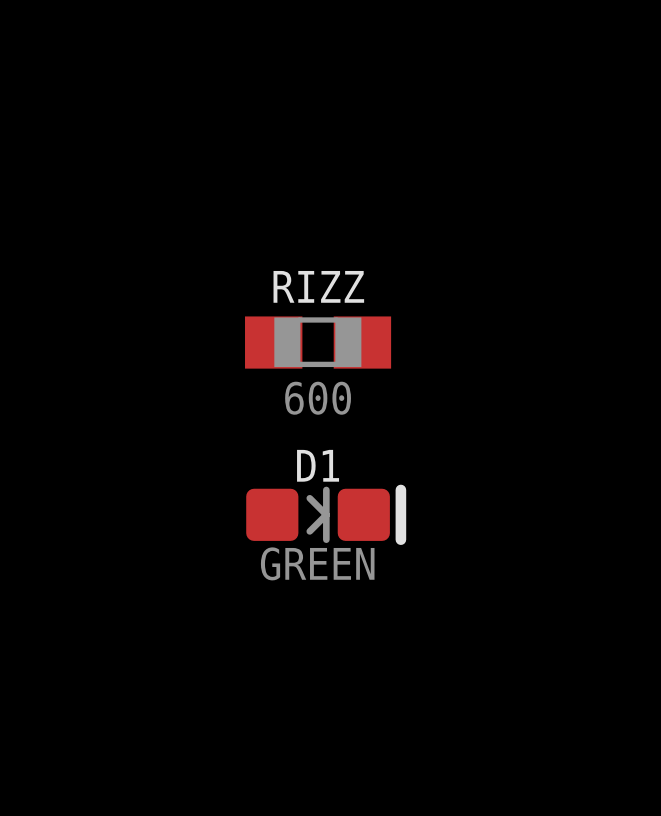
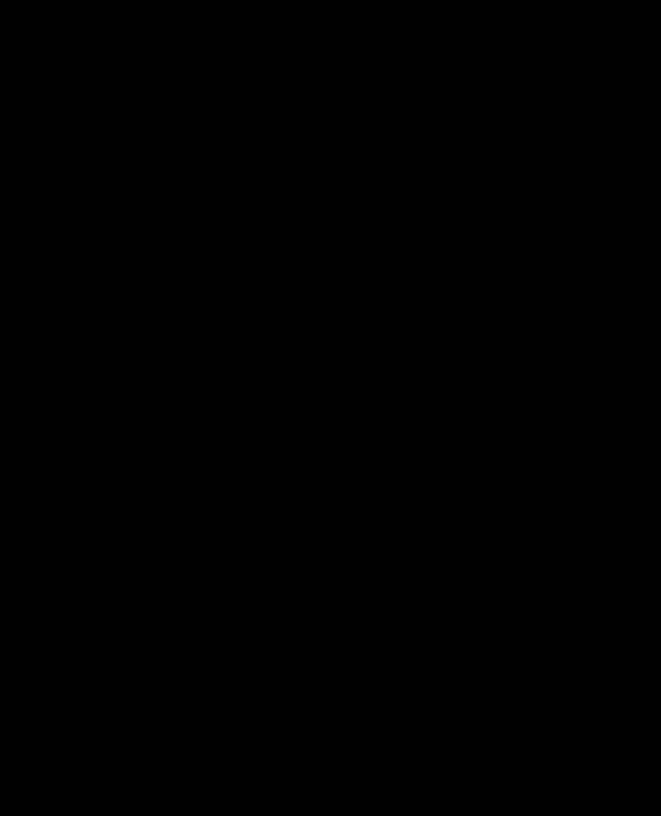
RIZZ: 600 (318, 342) -> none
D1: GREEN (326, 514) -> none

